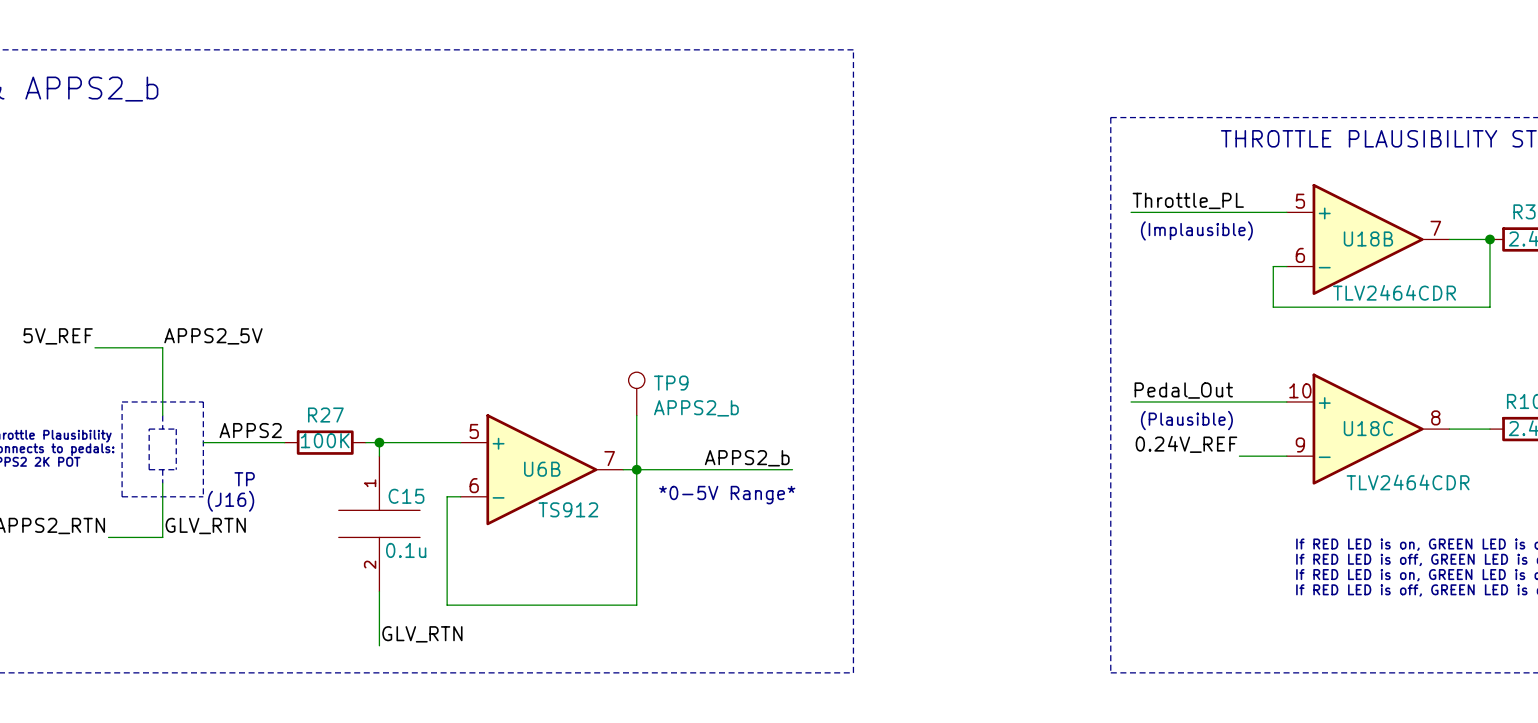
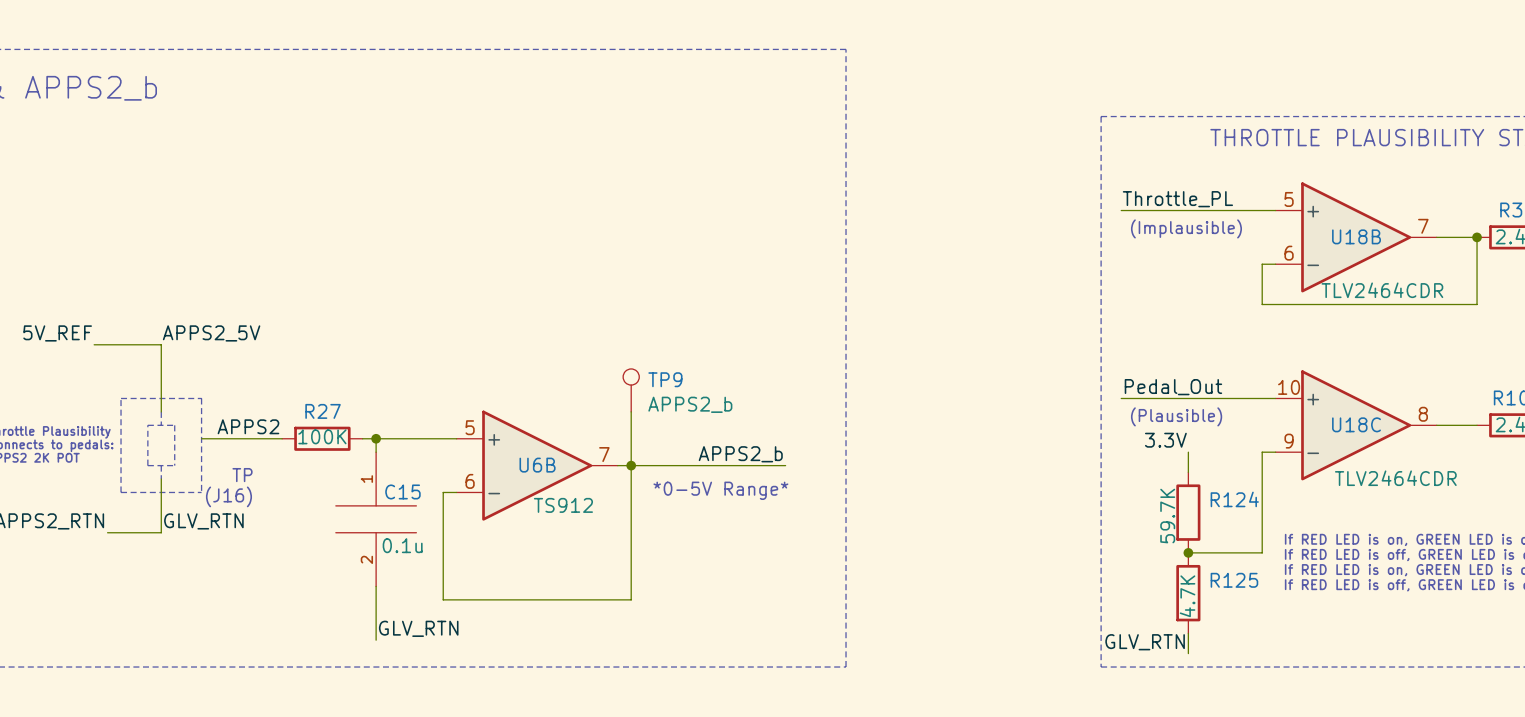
label: none -> 3.3V (1165, 440)
label: 0.24V_REF (1186, 444) -> none
wire: none -> (1188, 452) (1188, 472)
wire: (1239, 456) (1273, 456) -> (1188, 552) (1262, 552) (1262, 452)
R124: none -> 59.7K (1188, 512)
junction: none -> (1188, 552)
R125: none -> 4.7K (1188, 593)
wire: none -> (1188, 633) (1188, 653)
label: none -> GLV_RTN (1145, 642)

